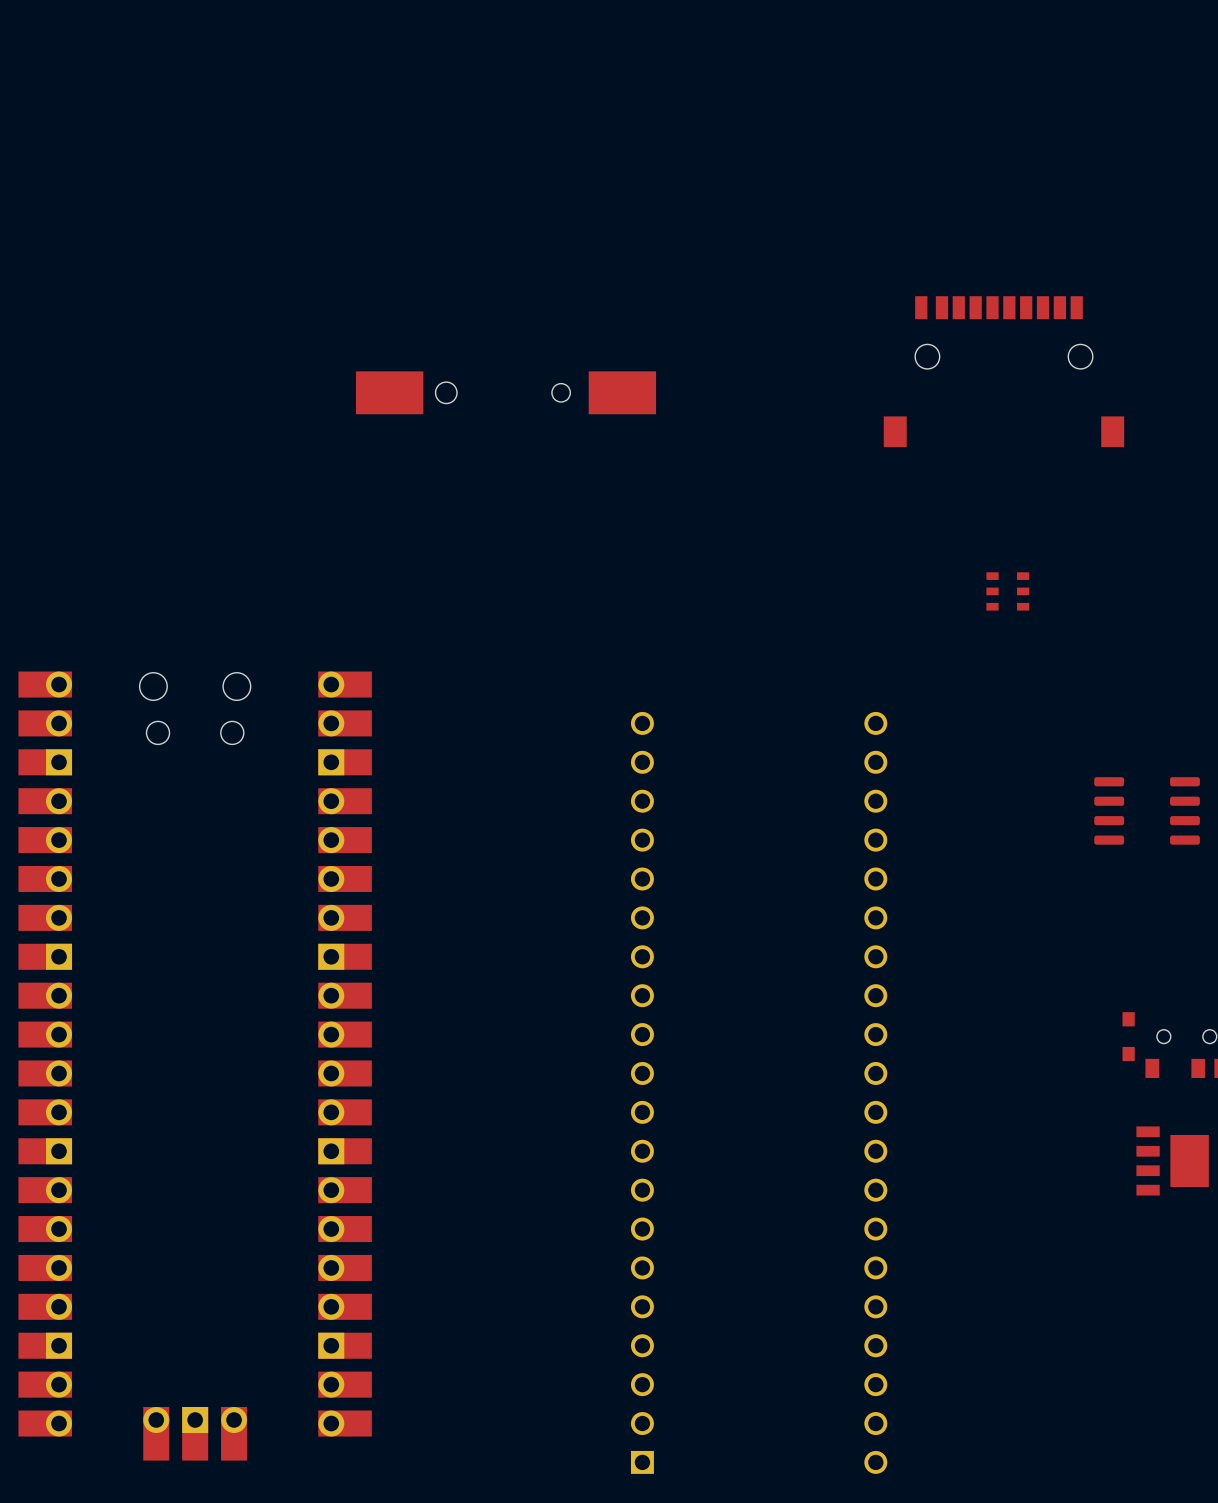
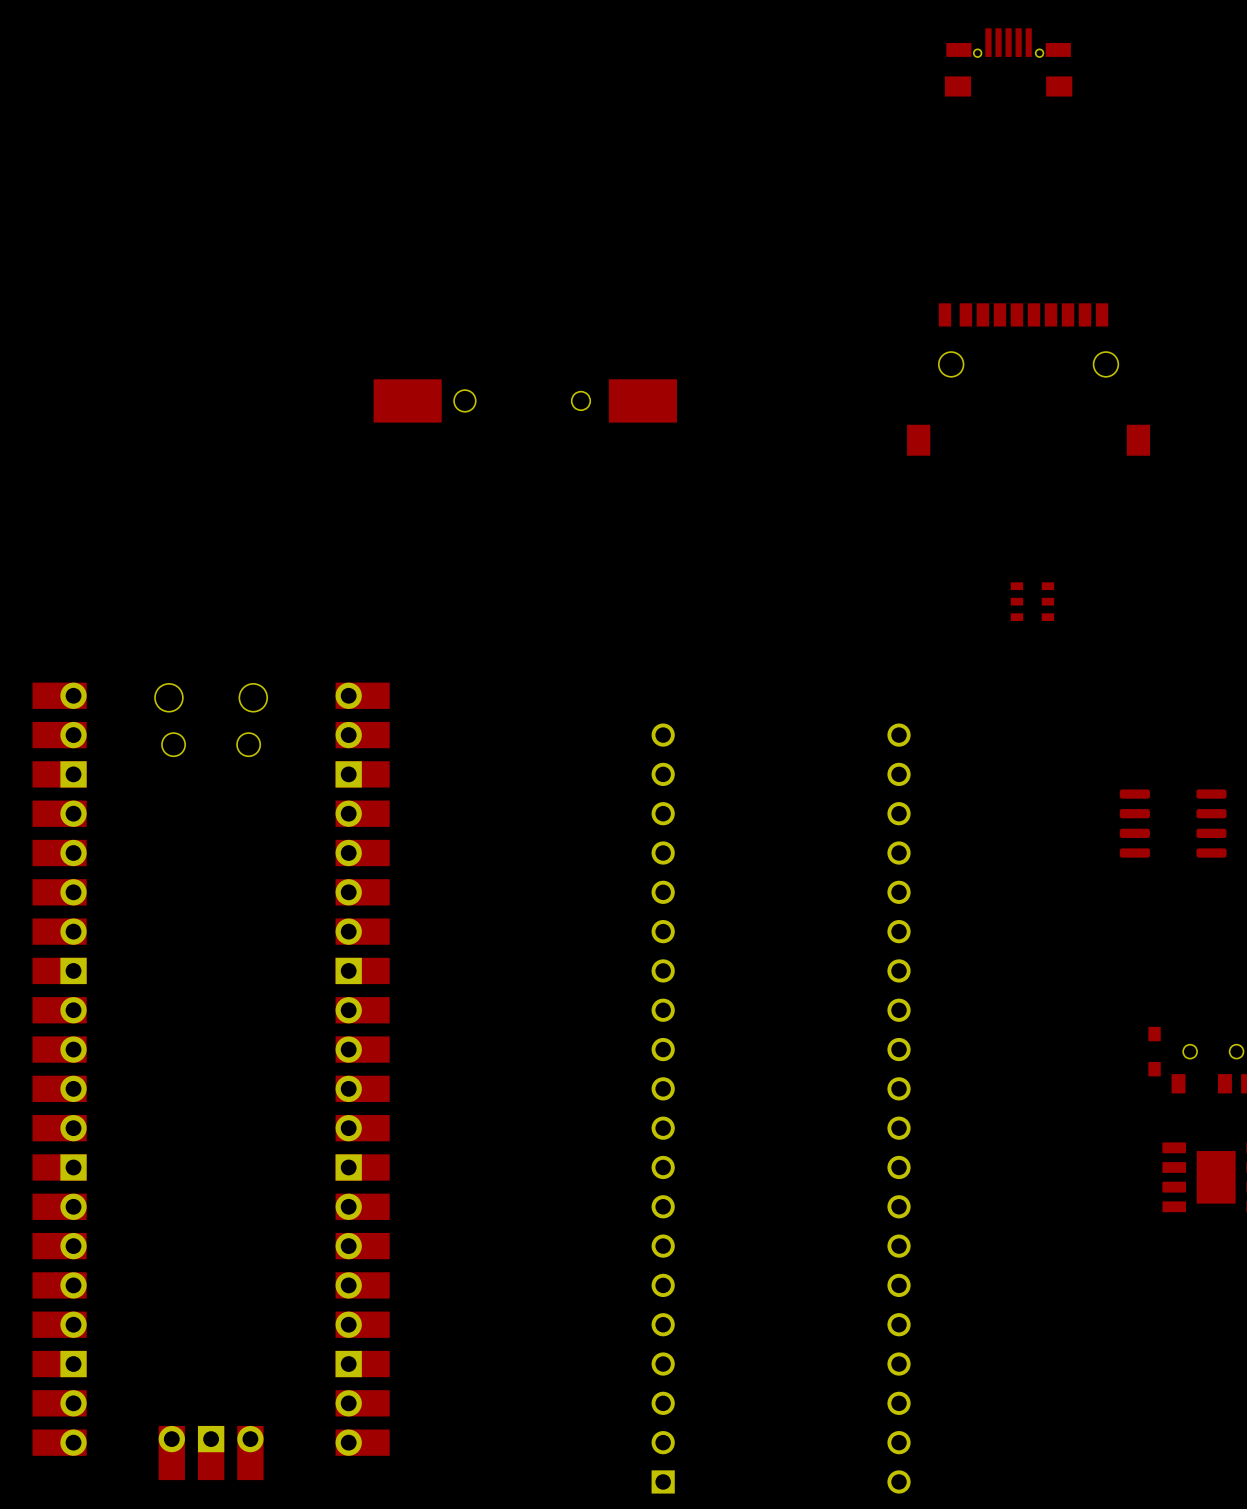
part: none -> (1008, 62)

